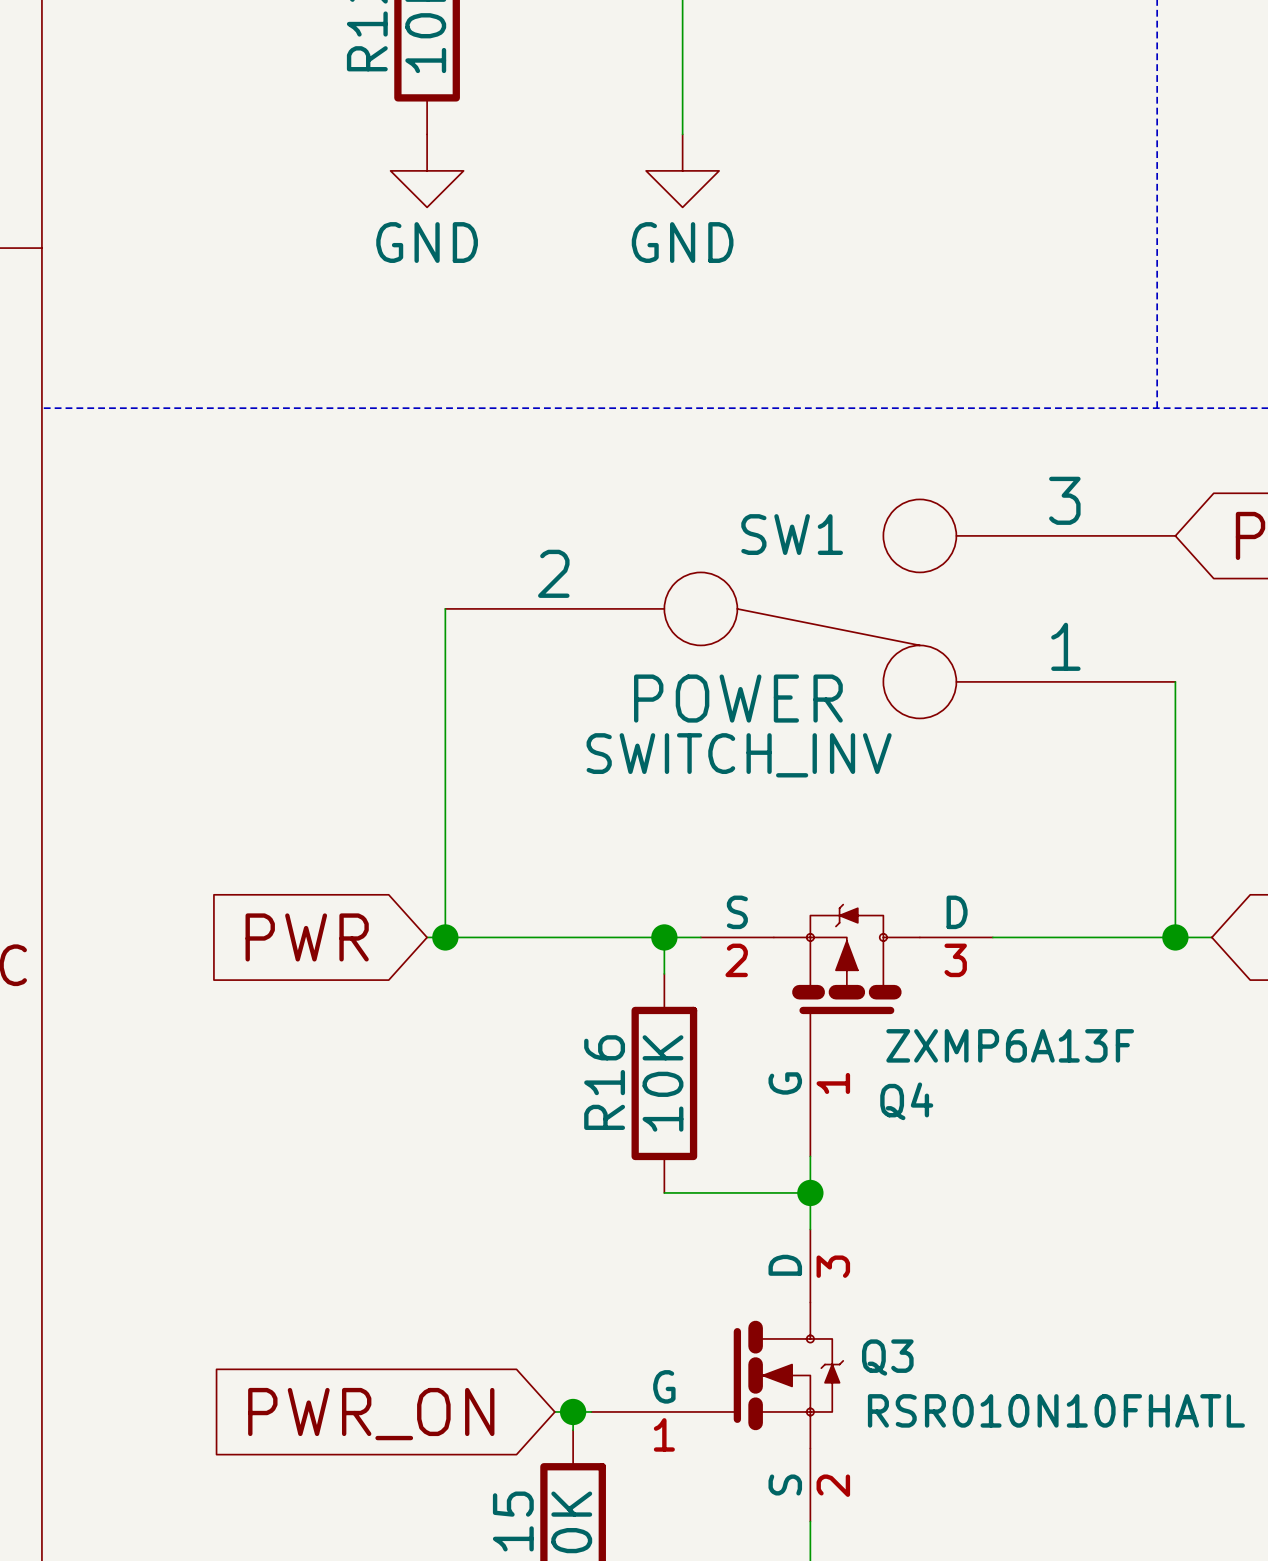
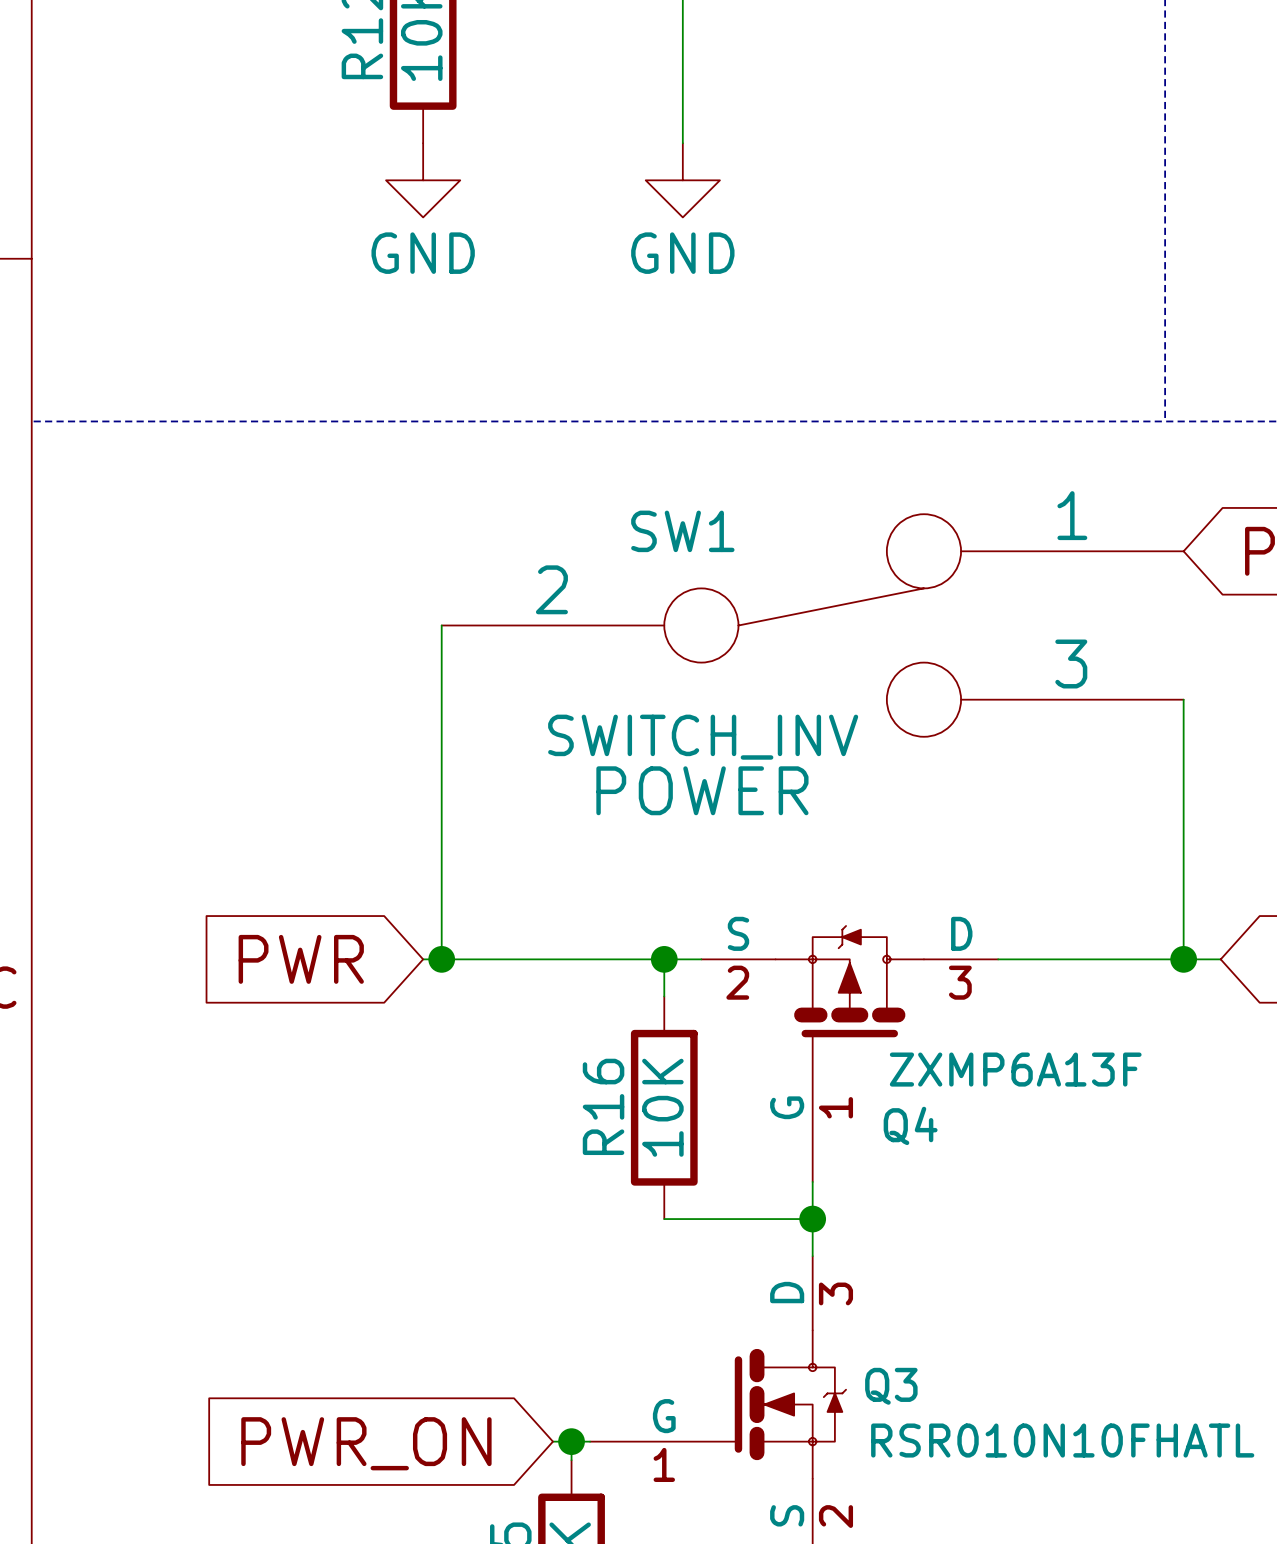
SW1 name position: SW1 (792, 534) -> SW1 (682, 531)
SW1 flip: as is (810, 608) -> up-down (812, 625)
SW1 text position: POWER (738, 698) -> POWER (702, 790)

